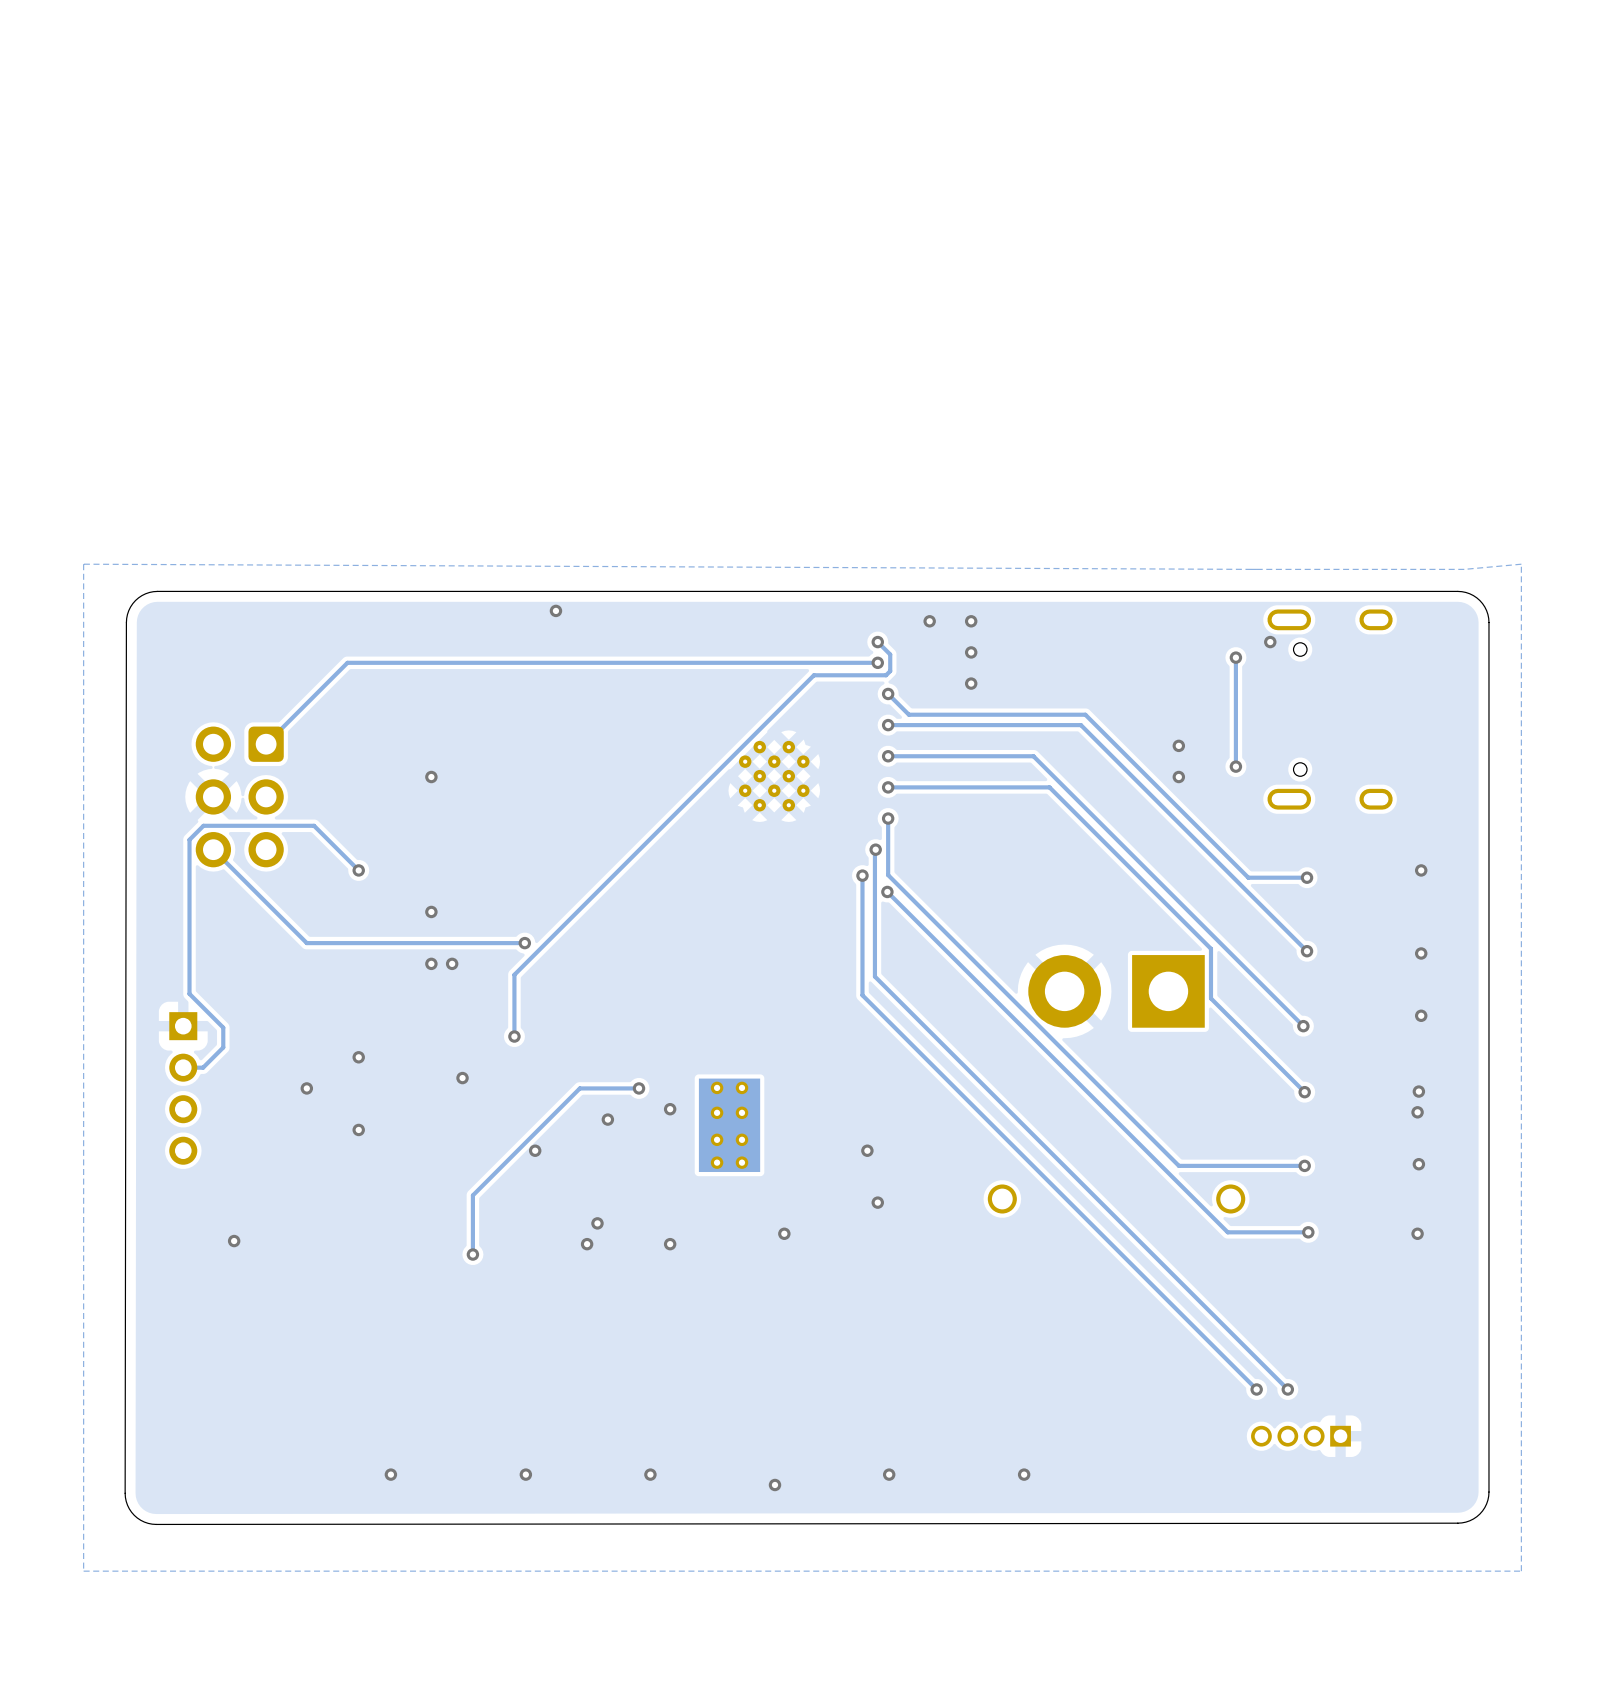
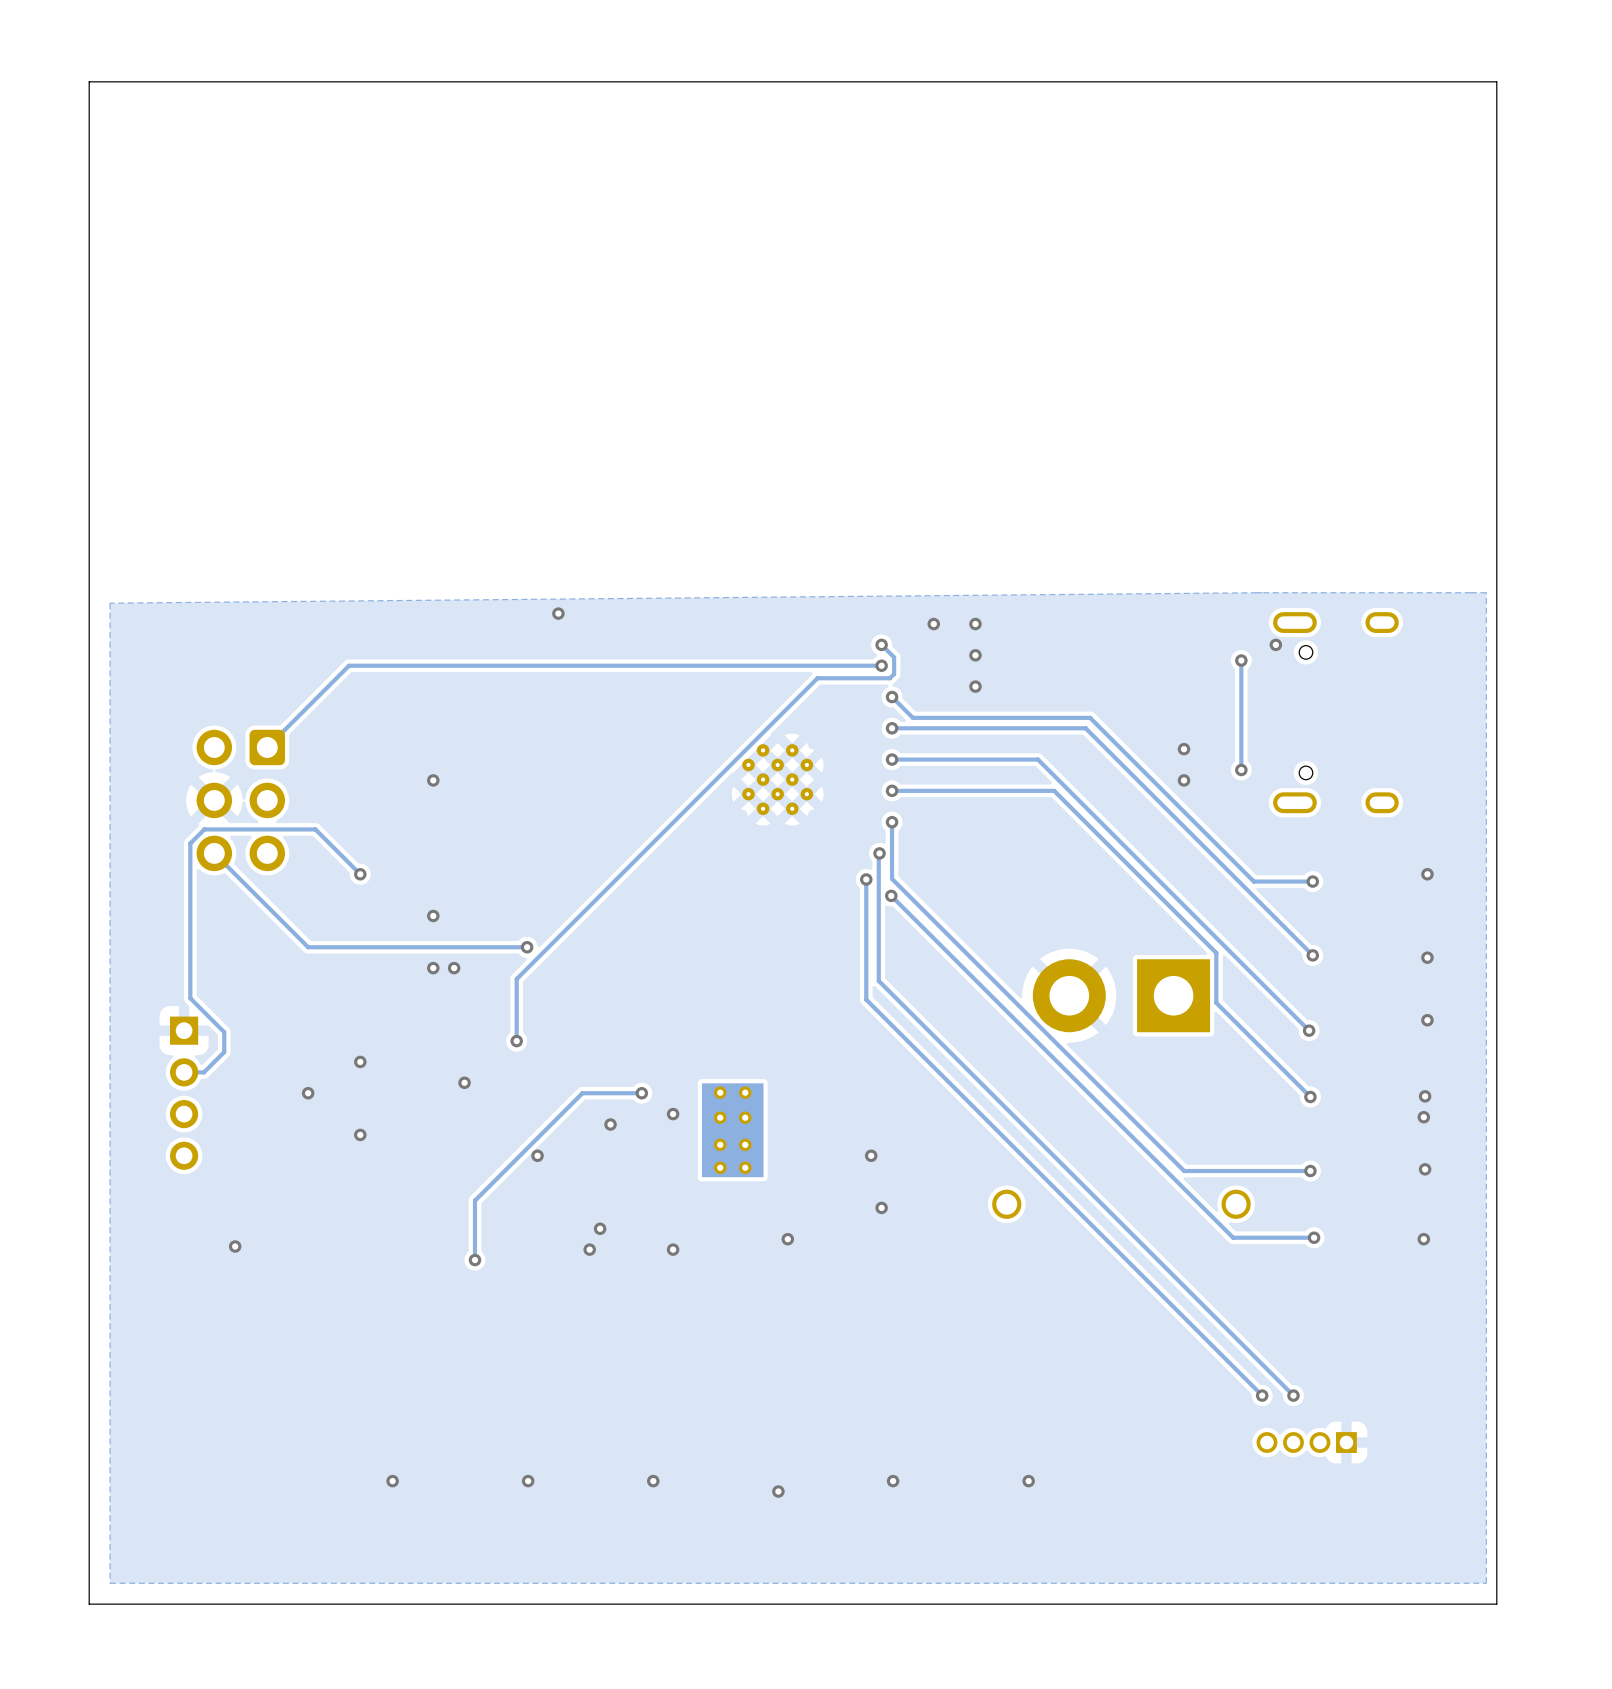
zone outline: (1521, 564) (1521, 1571) (83, 1571) (83, 564) (1251, 569) (1464, 569) (1521, 564) -> (1486, 592) (1486, 1583) (110, 1583) (110, 603) (1256, 592) (1486, 592)
board edge: (1457, 591) (157, 591) (149, 592) (138, 597) (130, 606) (126, 622) (125, 1493) (126, 1501) (131, 1512) (144, 1522) (156, 1524) (1457, 1523) (1465, 1522) (1476, 1516) (1484, 1507) (1488, 1492) (1488, 622) (1486, 610) (1479, 600) (1469, 593) (1457, 591) -> (1496, 81) (1496, 1604) (89, 1604) (89, 81) (1496, 81)

